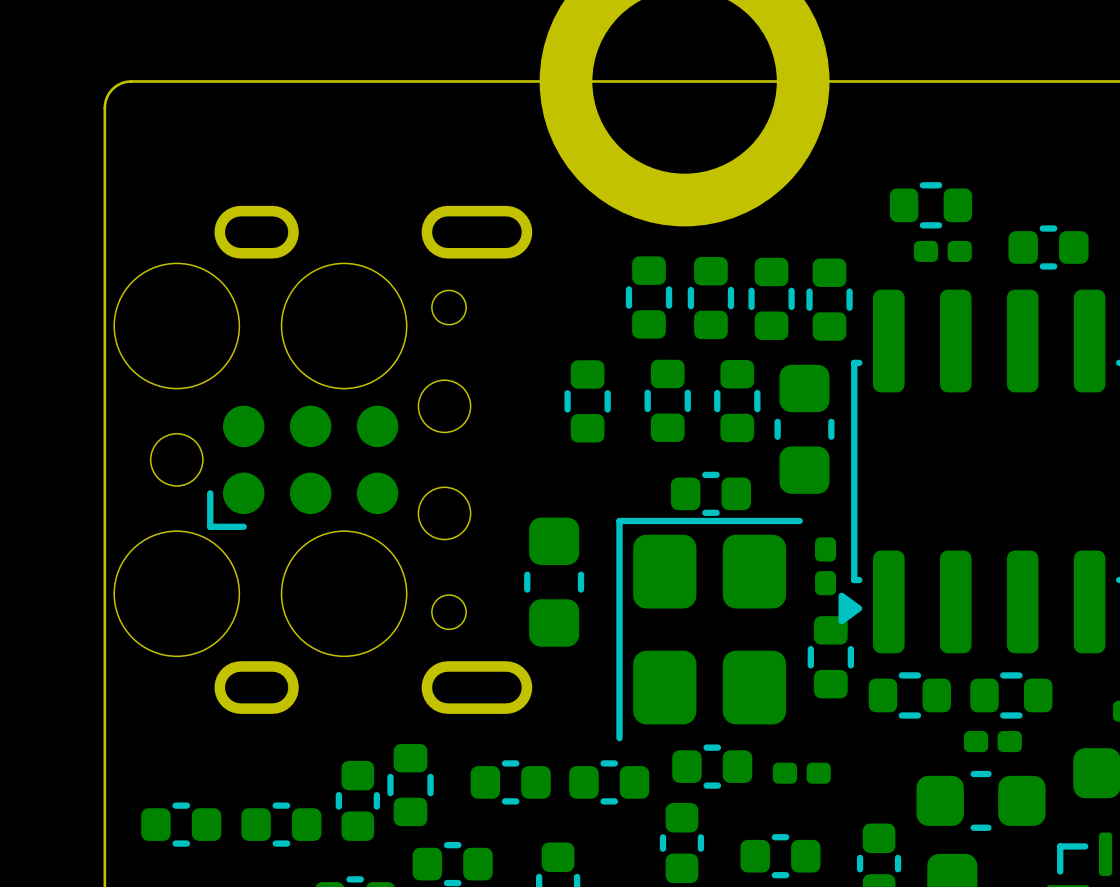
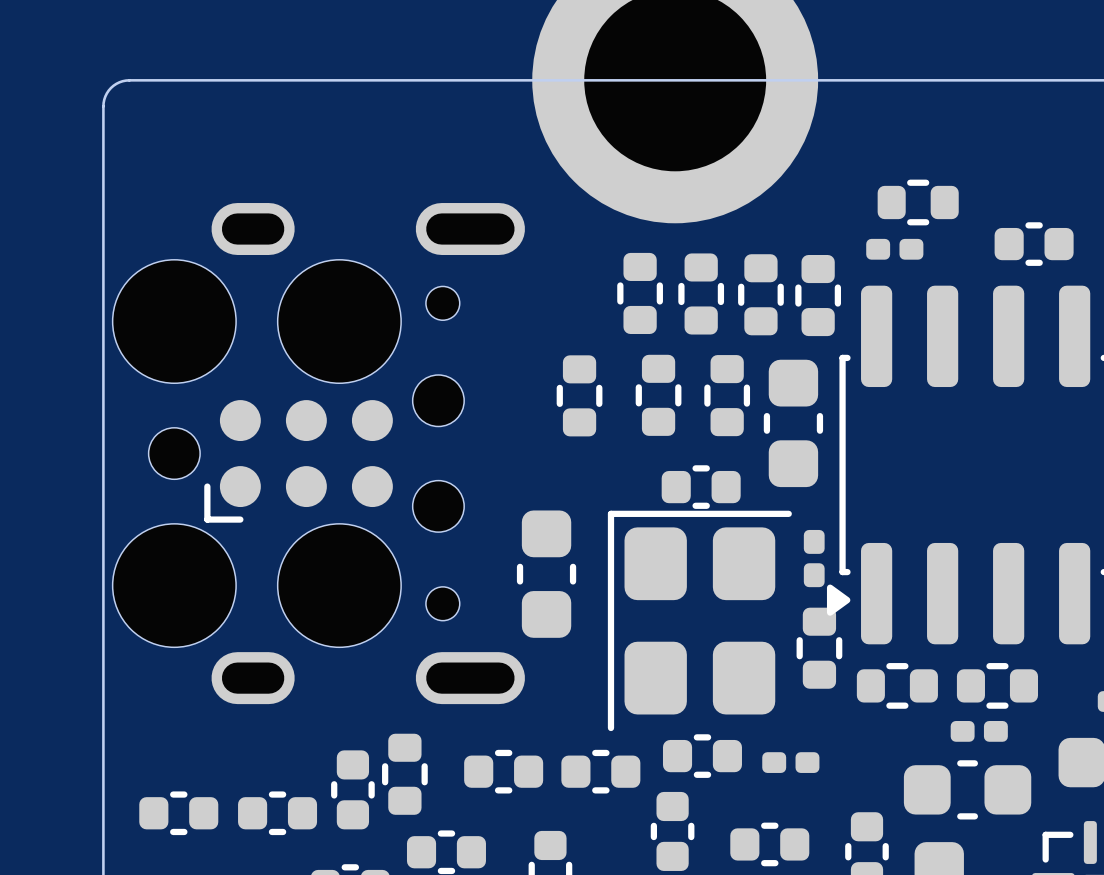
part position: (942, 251) -> (894, 249)

